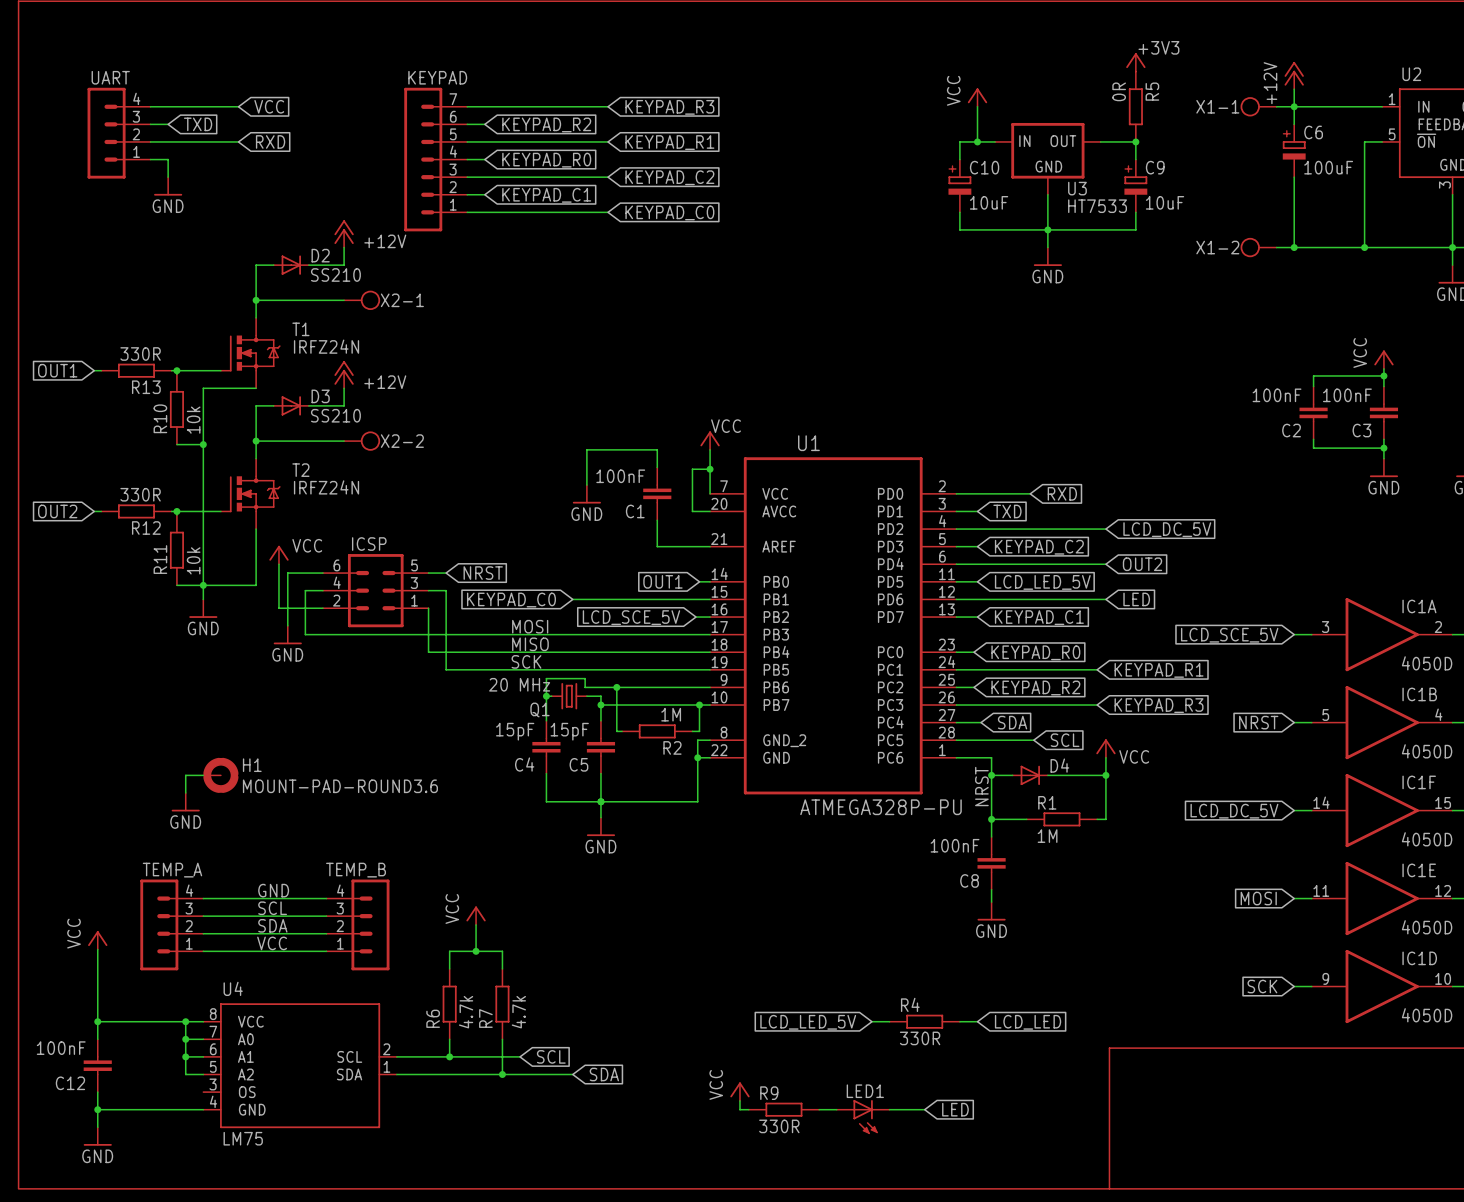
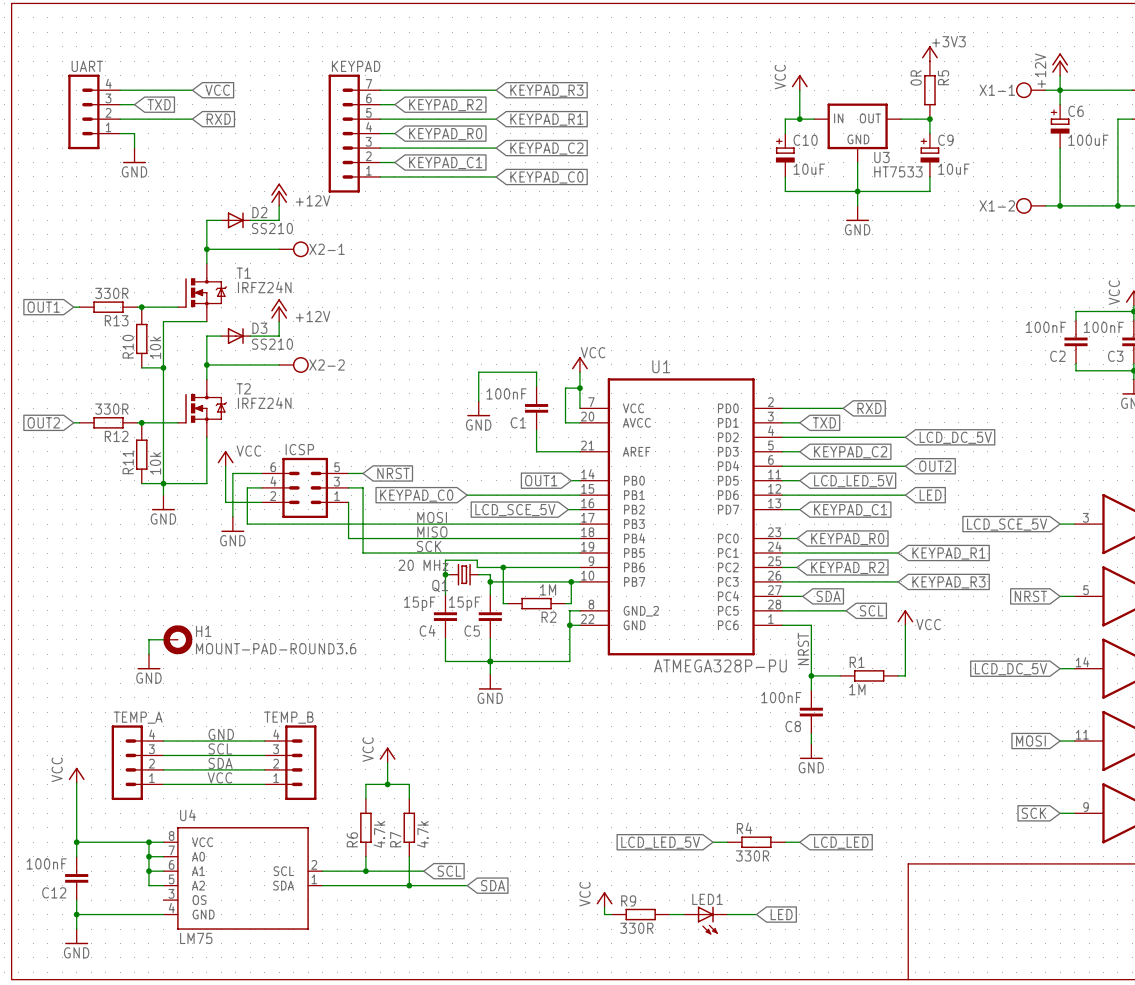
wire: (991, 775) (1012, 775) -> none
junction: (991, 775) -> none
D4: (1030, 775) -> none
wire: (1047, 775) (1105, 775) -> none
junction: (1105, 775) -> none

